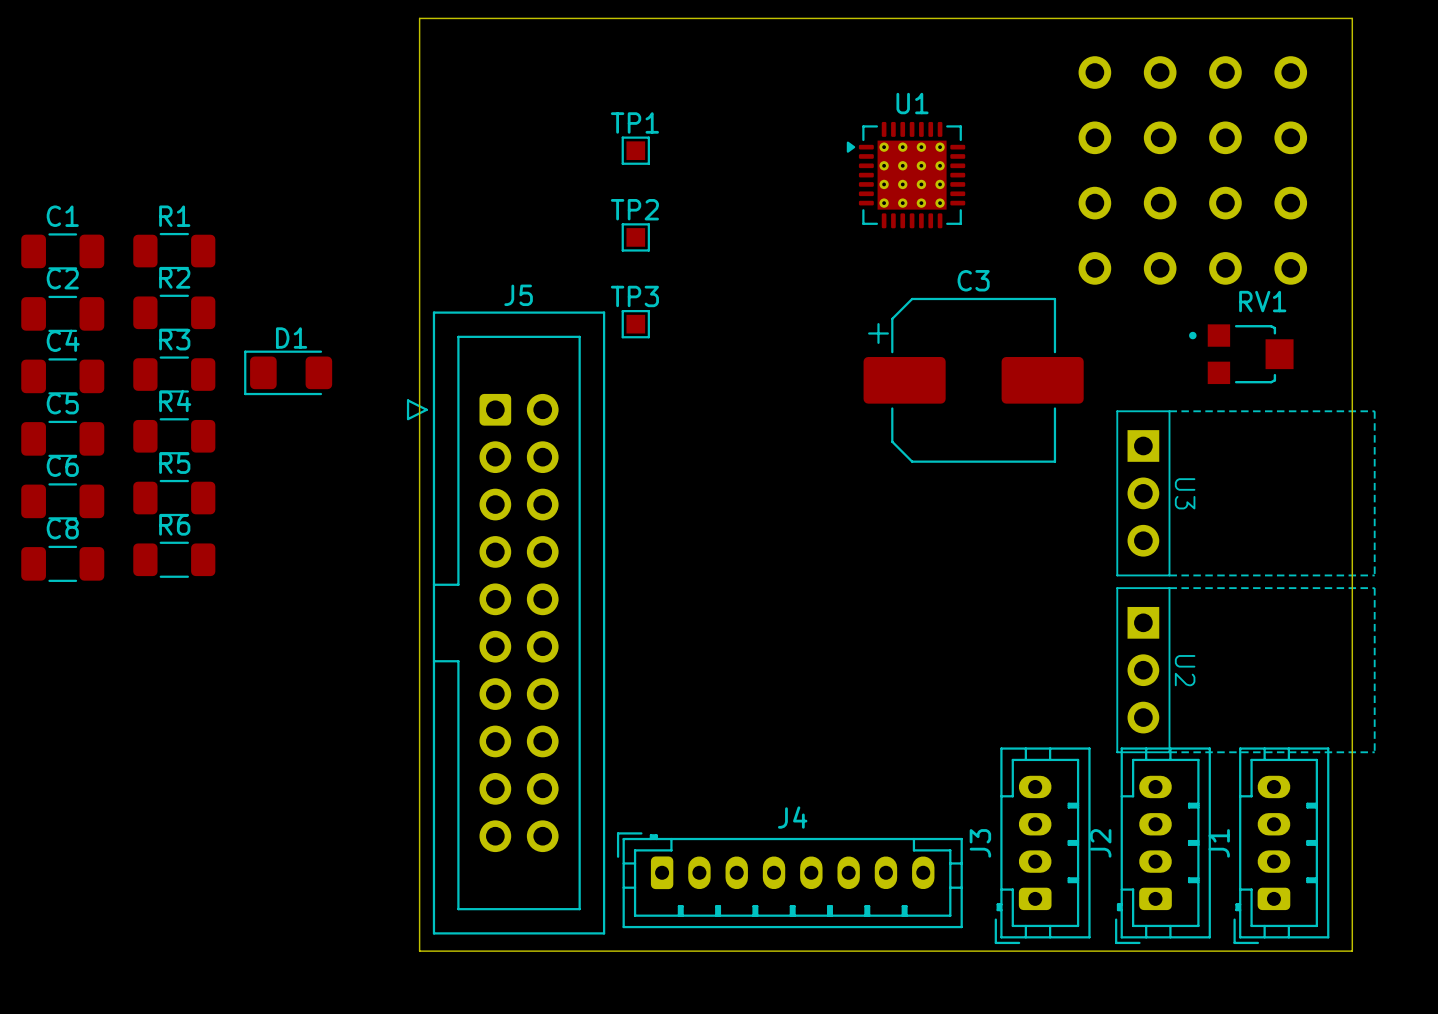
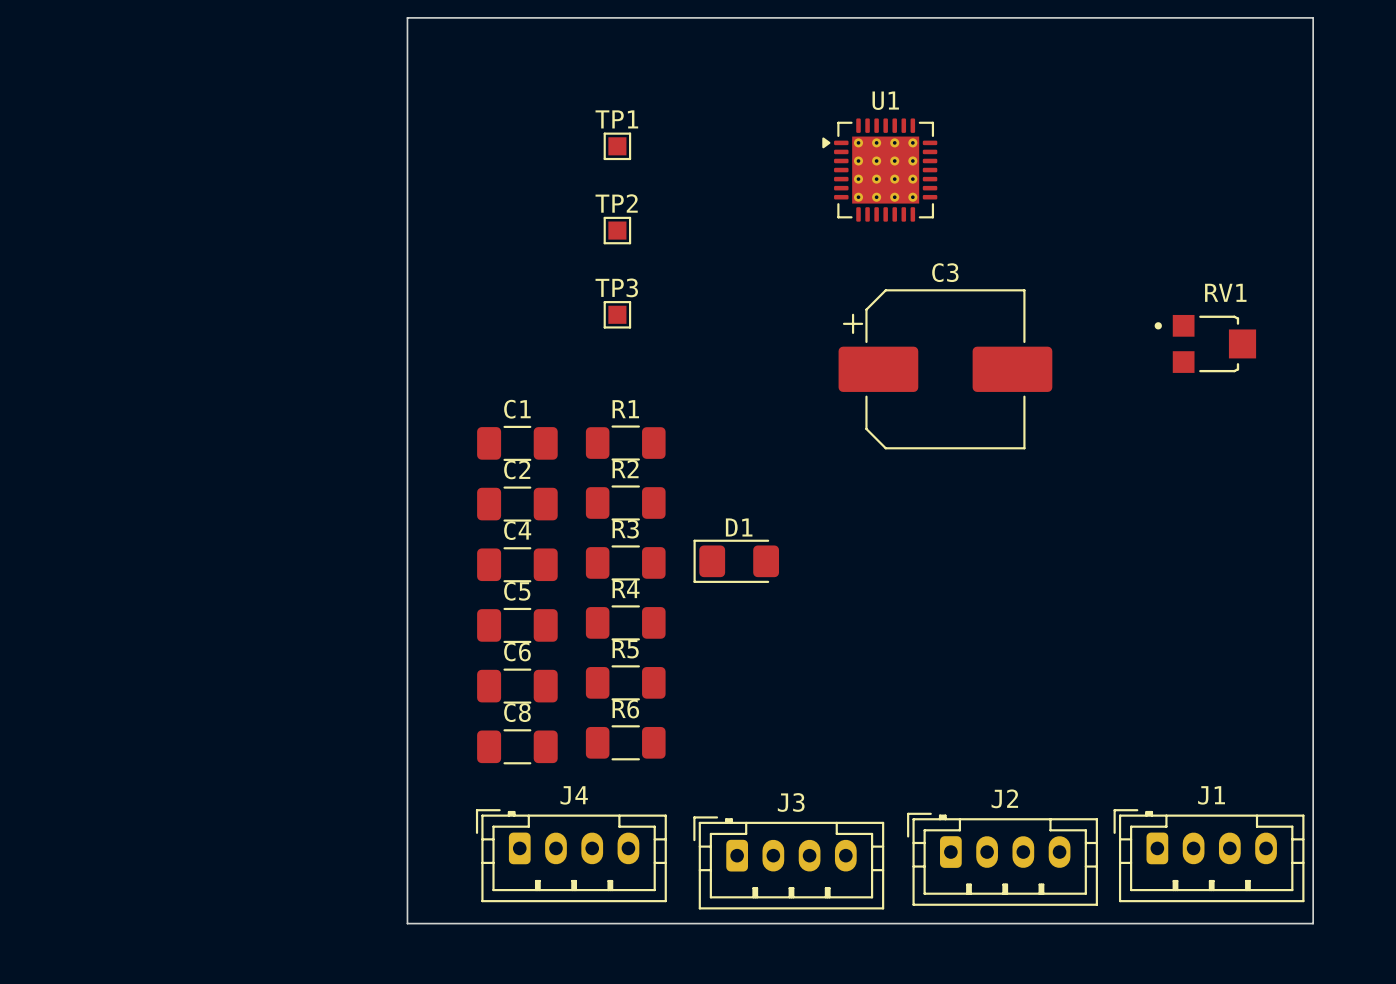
part: (1094, 72) -> none
part: (1160, 72) -> none
part: (1225, 72) -> none
part: (1290, 72) -> none
part: (1094, 137) -> none
part: (1160, 137) -> none
part: (1225, 137) -> none
part: (1290, 137) -> none
part: (1094, 203) -> none
part: (1160, 203) -> none
part: (1225, 203) -> none
part: (1290, 203) -> none
C1 position: (62, 251) -> (517, 443)
R1 position: (174, 251) -> (625, 443)
part: (1094, 268) -> none
part: (1160, 268) -> none
part: (1225, 268) -> none
part: (1290, 268) -> none
R2 position: (174, 312) -> (625, 502)
C2 position: (62, 313) -> (517, 504)
D1 position: (288, 372) -> (736, 561)
R3 position: (174, 374) -> (625, 562)
C4 position: (62, 376) -> (517, 564)
R4 position: (174, 436) -> (625, 622)
C5 position: (62, 438) -> (517, 625)
U3: (1245, 493) -> none
R5 position: (174, 498) -> (625, 682)
C6 position: (62, 501) -> (517, 686)
R6 position: (174, 559) -> (625, 742)
C8 position: (62, 563) -> (517, 746)
J5: (506, 623) -> none
U2: (1245, 670) -> none
J4 footprint: [616, 832, 963, 929] -> [475, 809, 667, 903]
J3 rotation: 0° (1042, 845) -> 90° clockwise (788, 862)
J3 position: (1042, 845) -> (788, 862)
J2 rotation: 0° (1162, 845) -> 90° clockwise (1002, 859)
J2 position: (1162, 845) -> (1002, 859)
J1 rotation: 0° (1281, 845) -> 90° clockwise (1209, 855)

